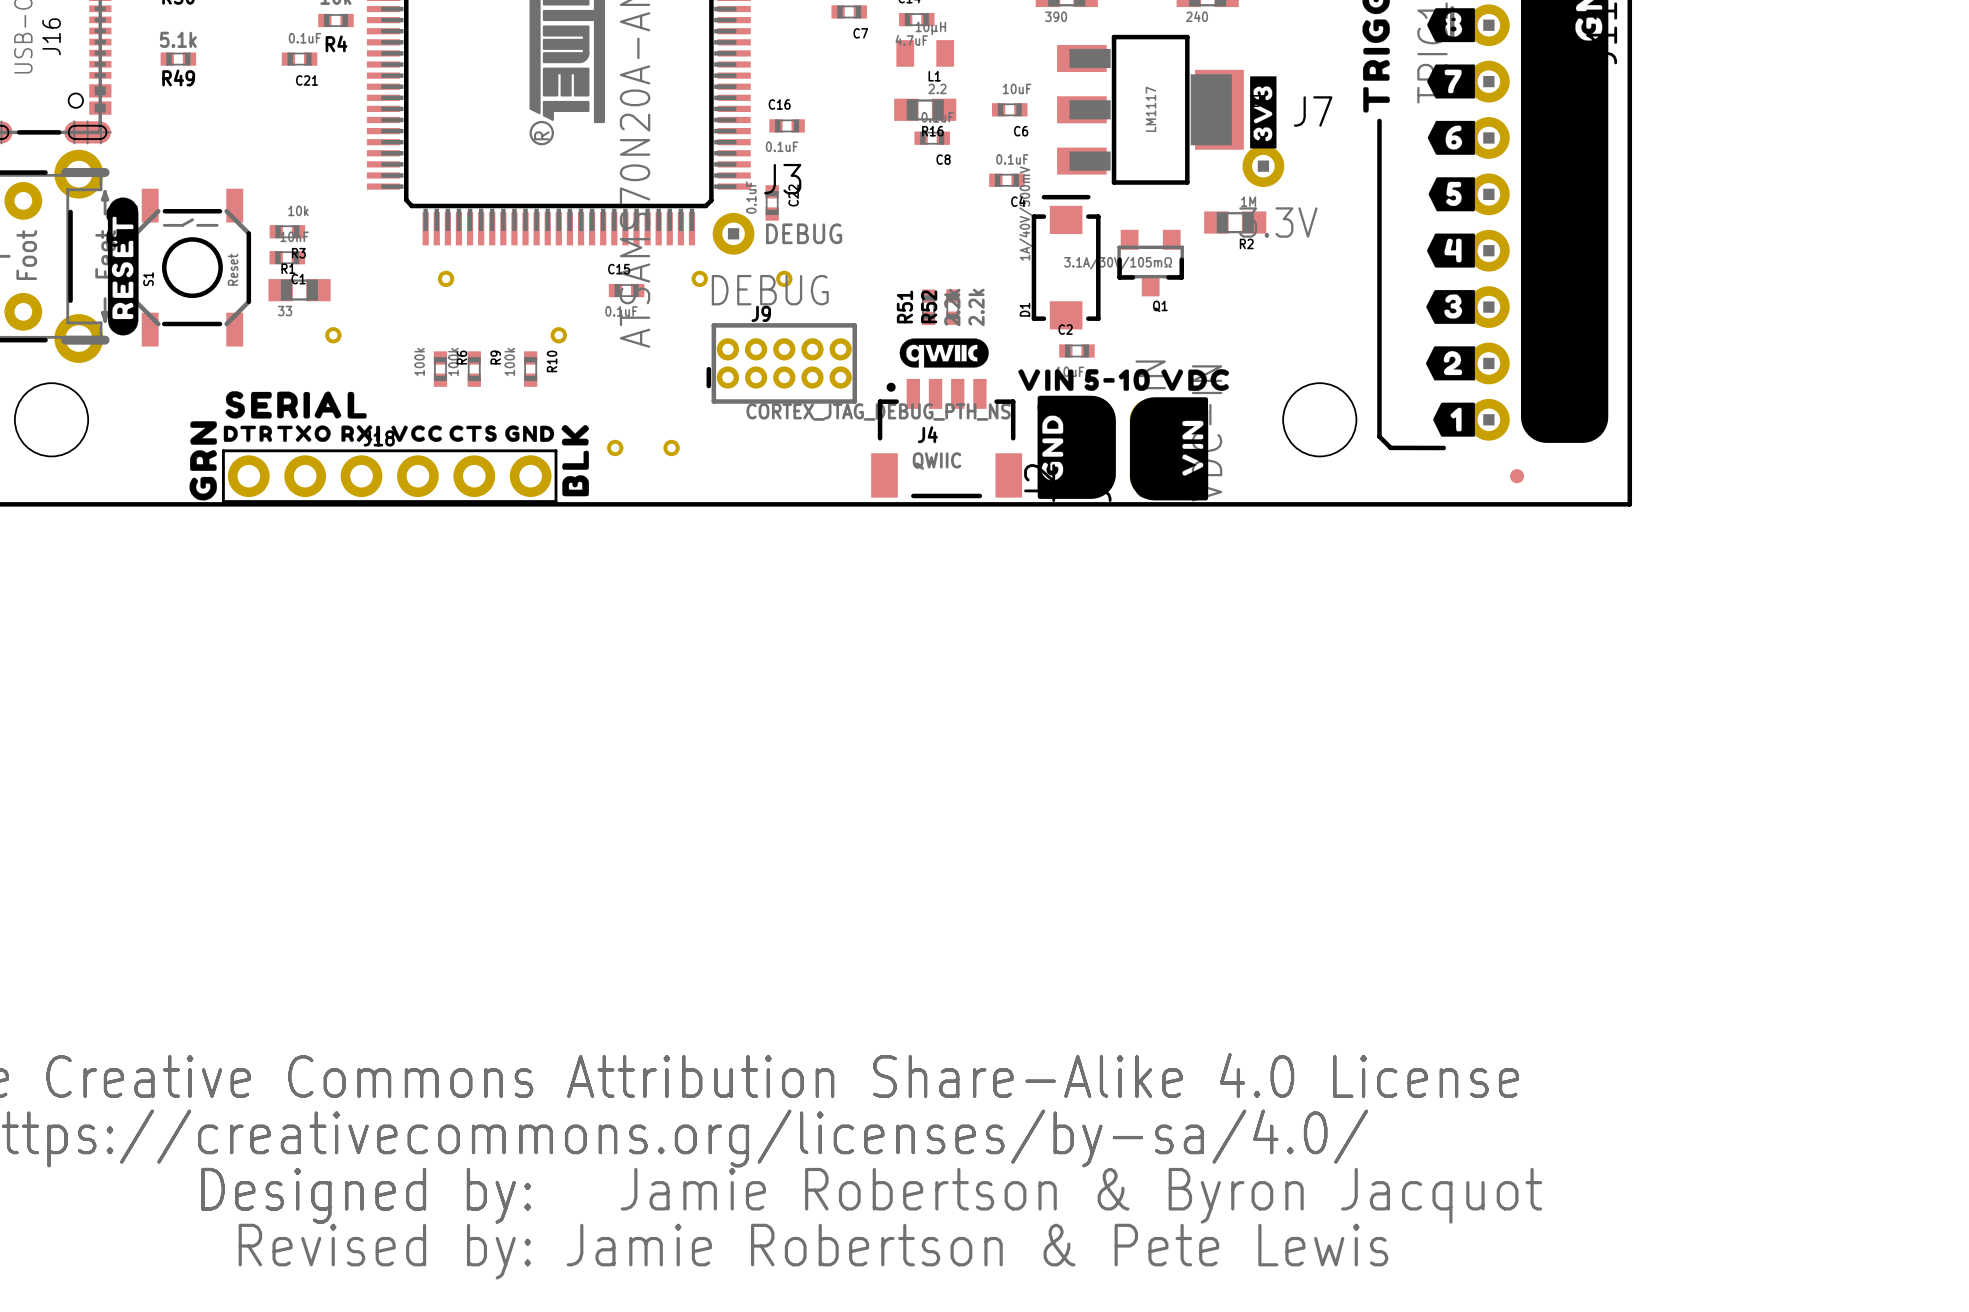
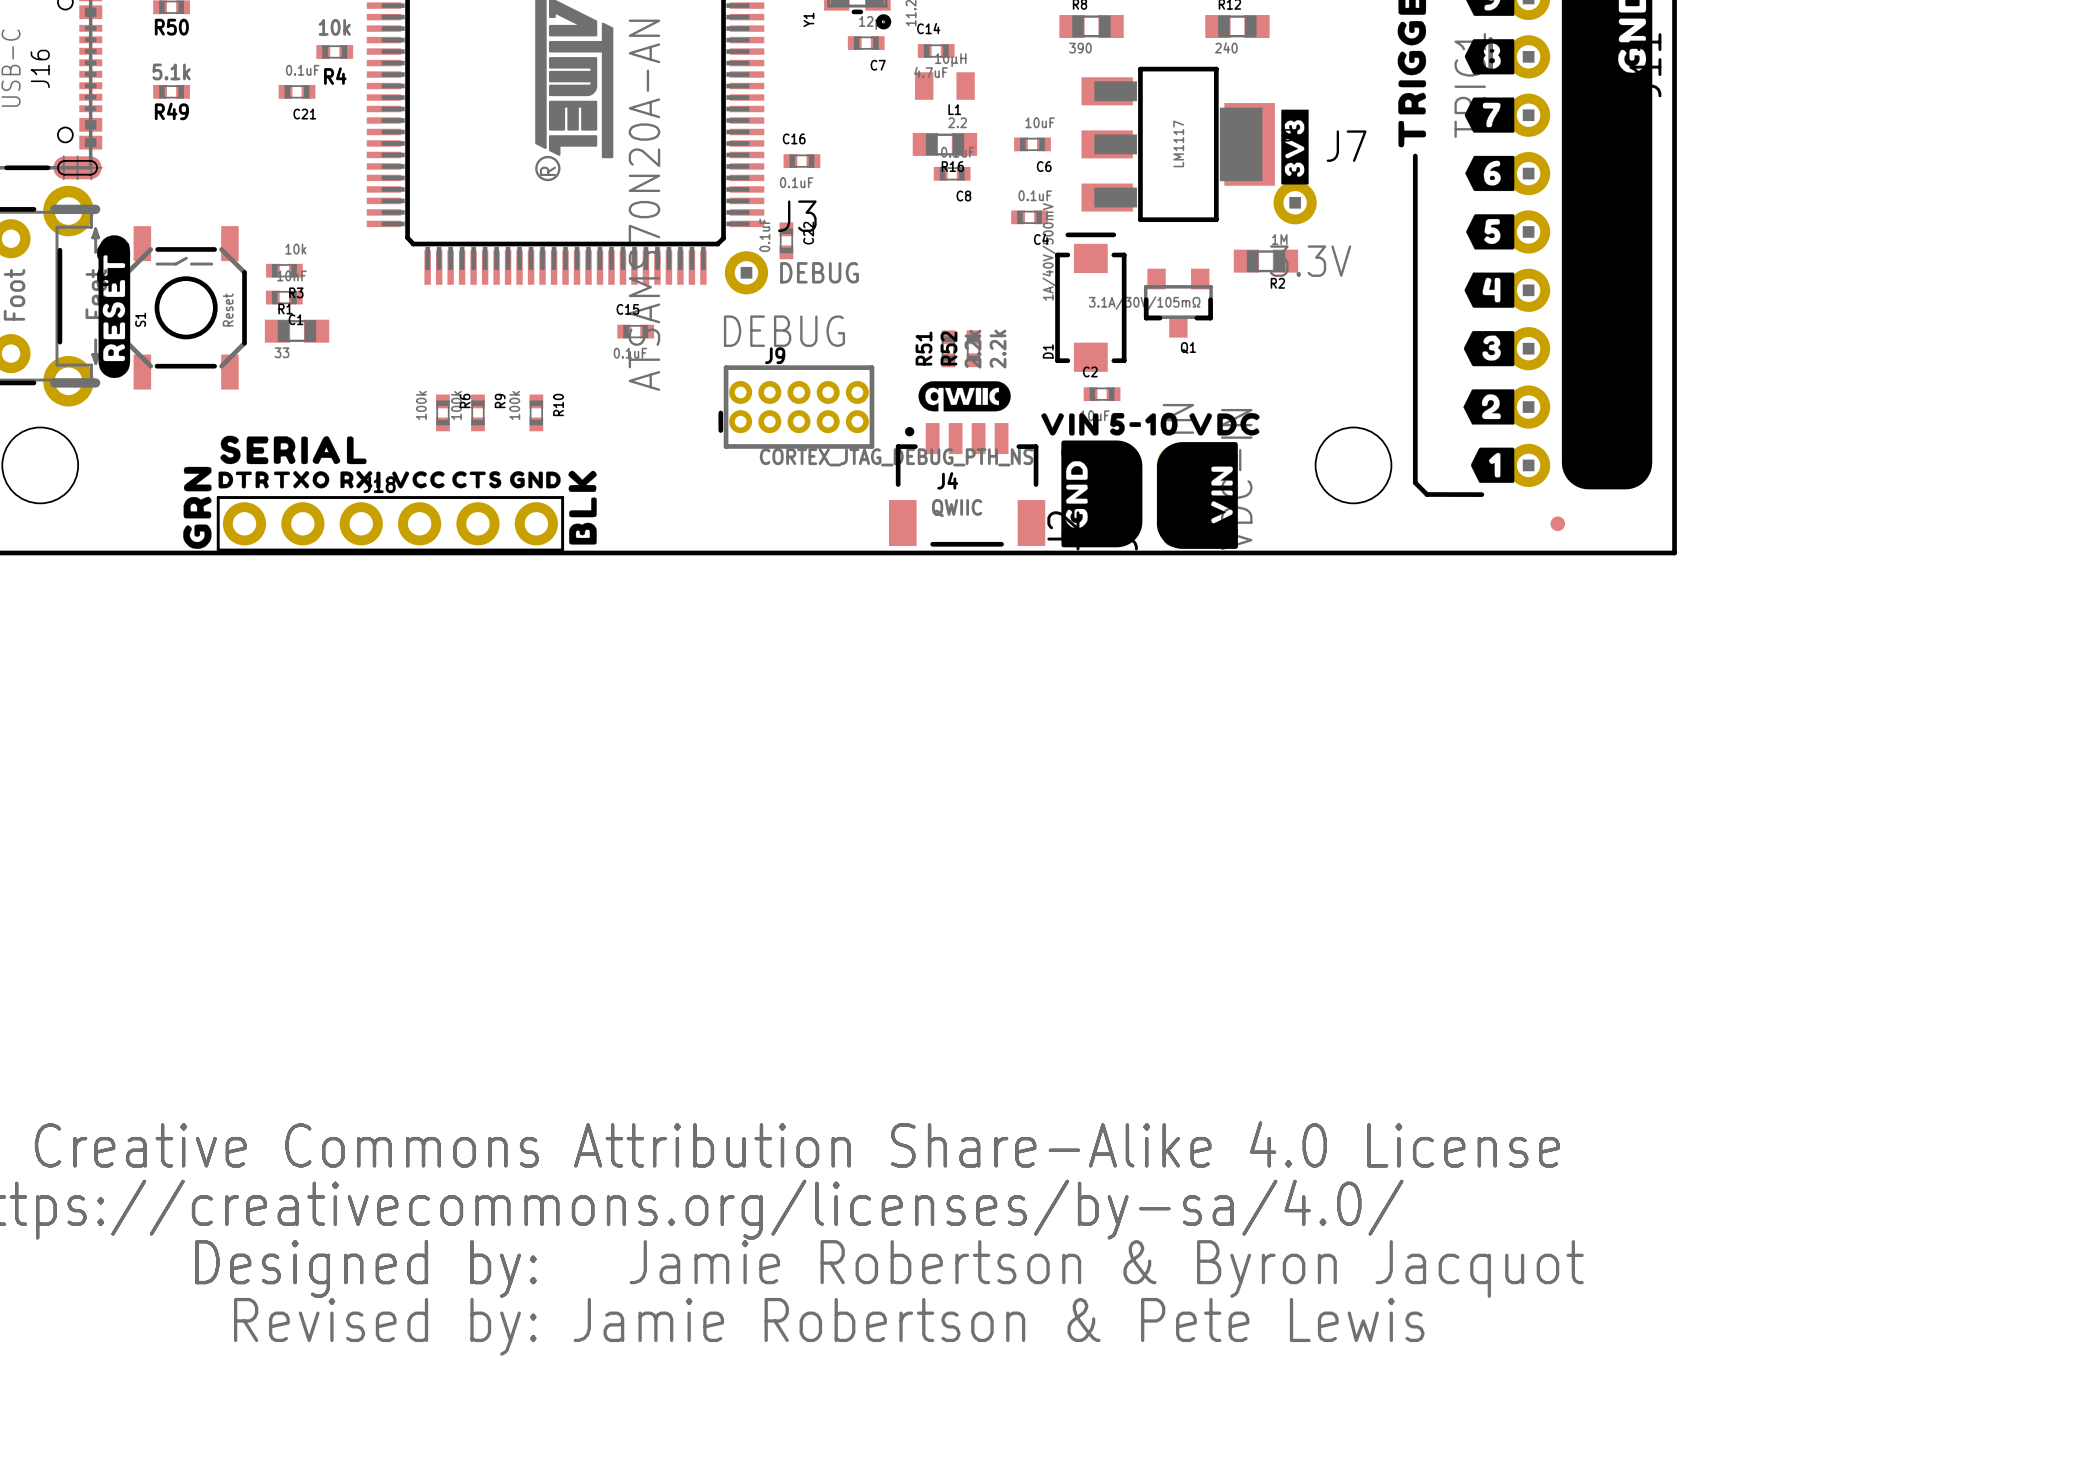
part: (446, 278) -> none
part: (699, 278) -> none
part: (784, 278) -> none
part: (333, 335) -> none
part: (558, 335) -> none
part: (615, 447) -> none
part: (671, 447) -> none

